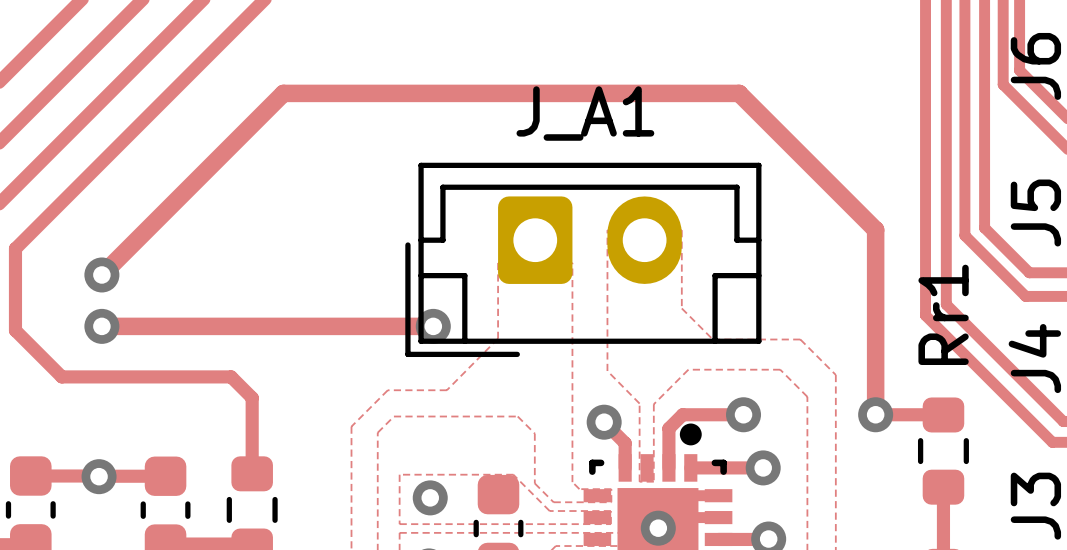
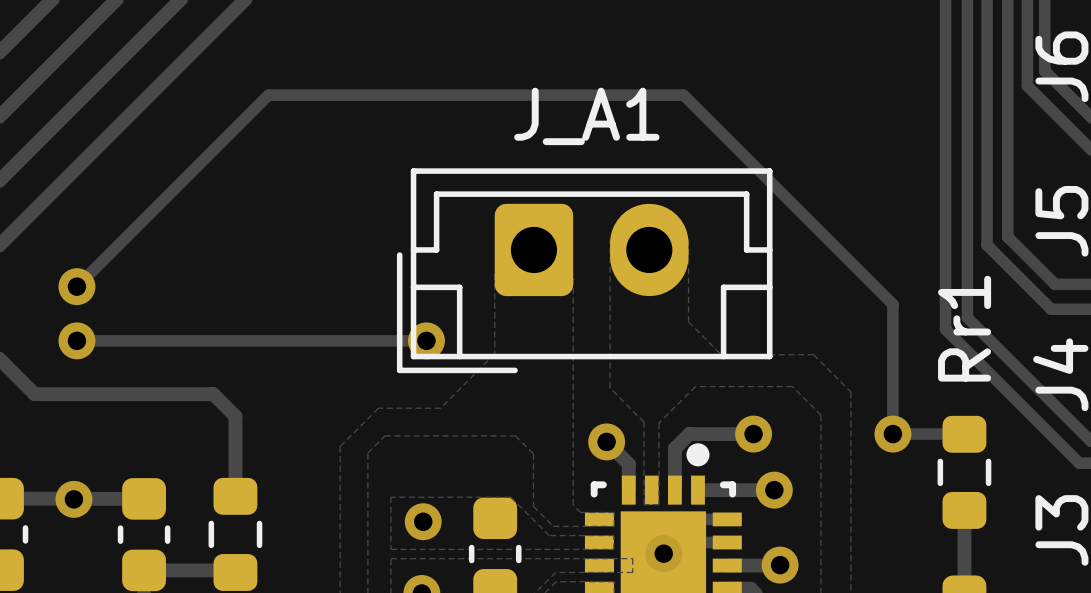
track: (677, 93) (739, 93) (875, 229) (875, 291) -> (683, 95) (892, 304)
track width: thick (677, 93) (283, 93) (101, 274) -> thin (683, 95) (268, 95) (76, 286)
track width: thick (875, 291) (875, 414) (943, 414) -> thin (892, 304) (892, 434) (964, 434)
track width: thick (101, 326) (433, 326) -> thin (76, 340) (426, 340)

